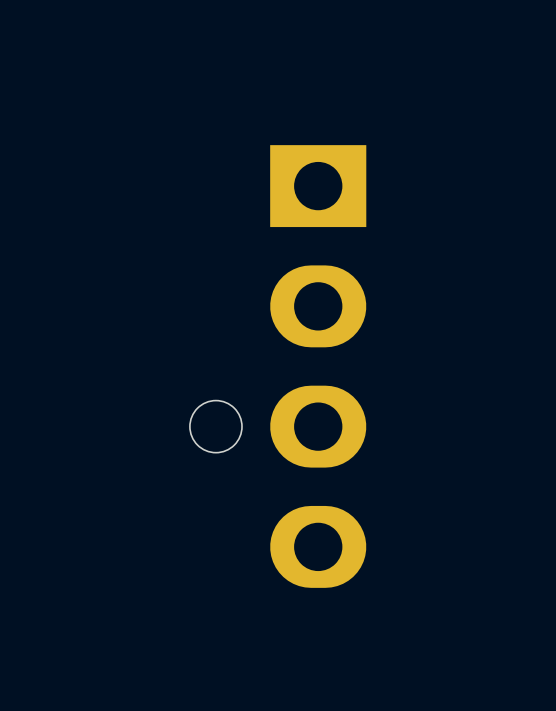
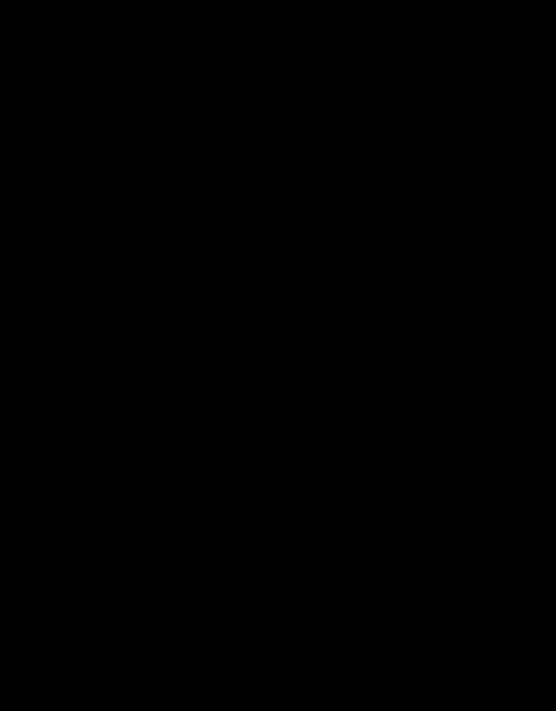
part: (278, 366) -> none

